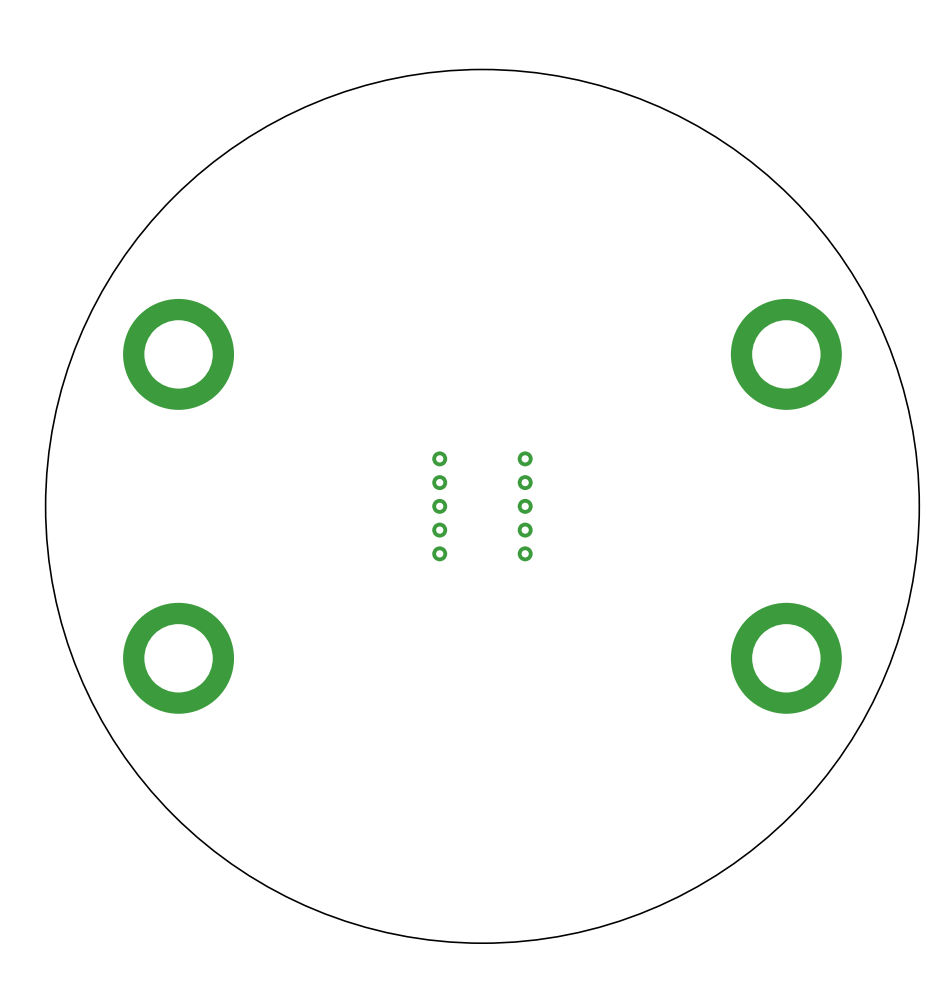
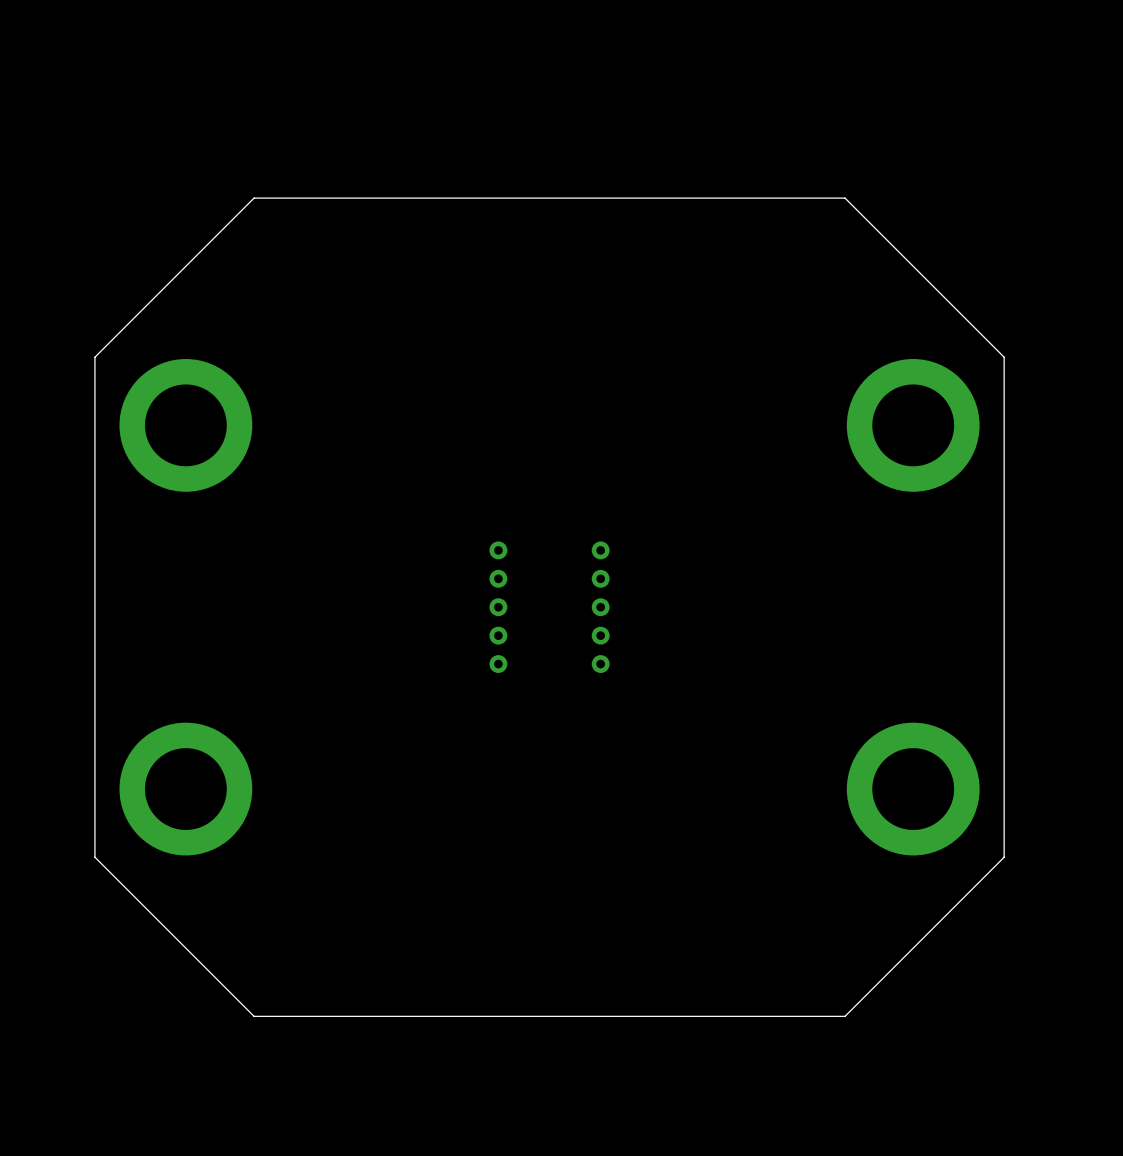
round board edge: [45, 69, 920, 944] -> none
board edge: none -> (845, 198) (254, 198) (94, 357) (94, 857) (254, 1016) (845, 1016) (1004, 857) (1004, 357) (845, 198)

